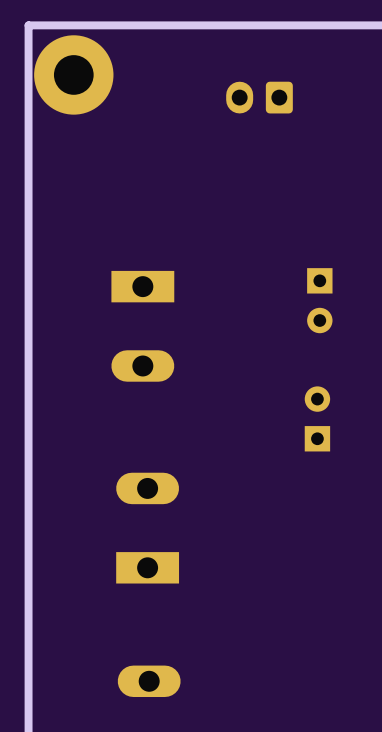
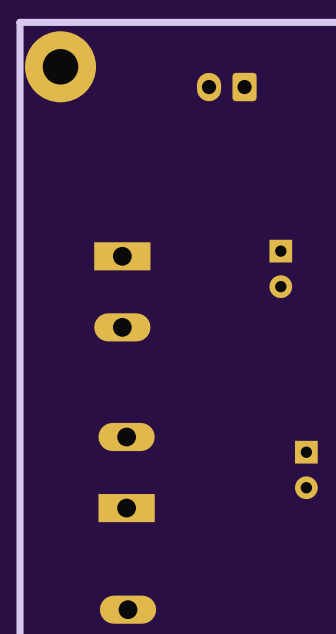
part rotation: 0° (317, 418) -> 180° (306, 469)
part position: (317, 418) -> (306, 469)

